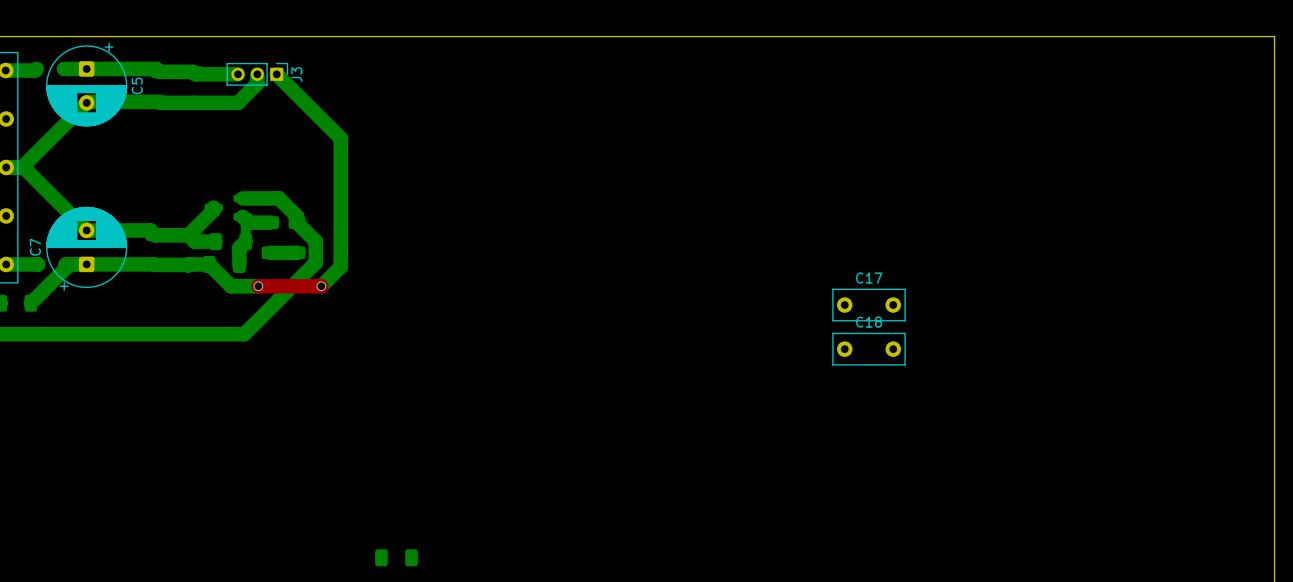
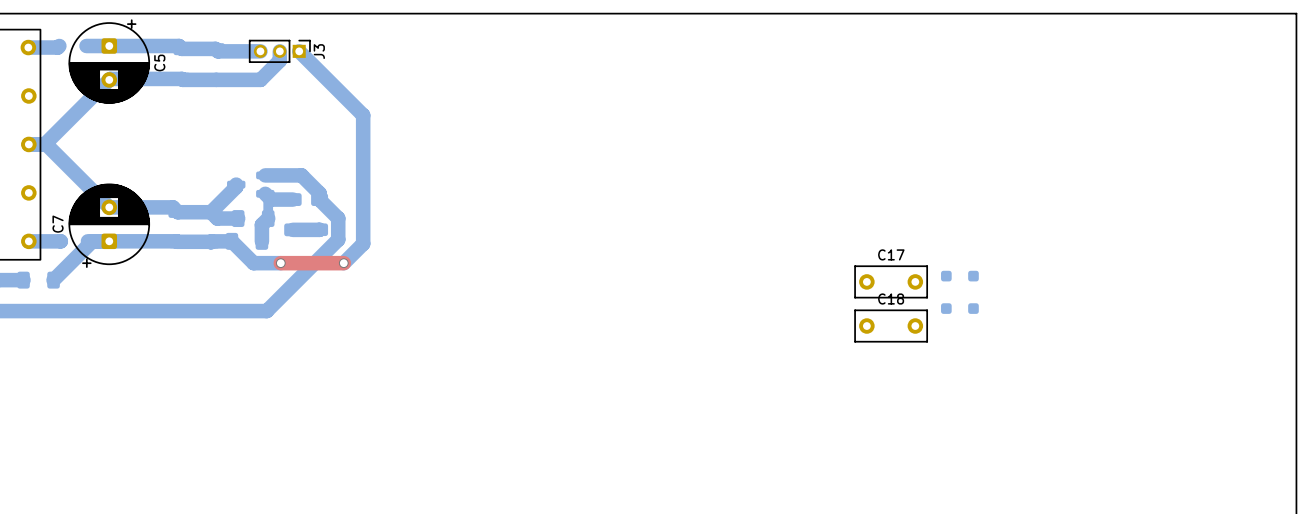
part: none -> (959, 276)
part: none -> (959, 308)

